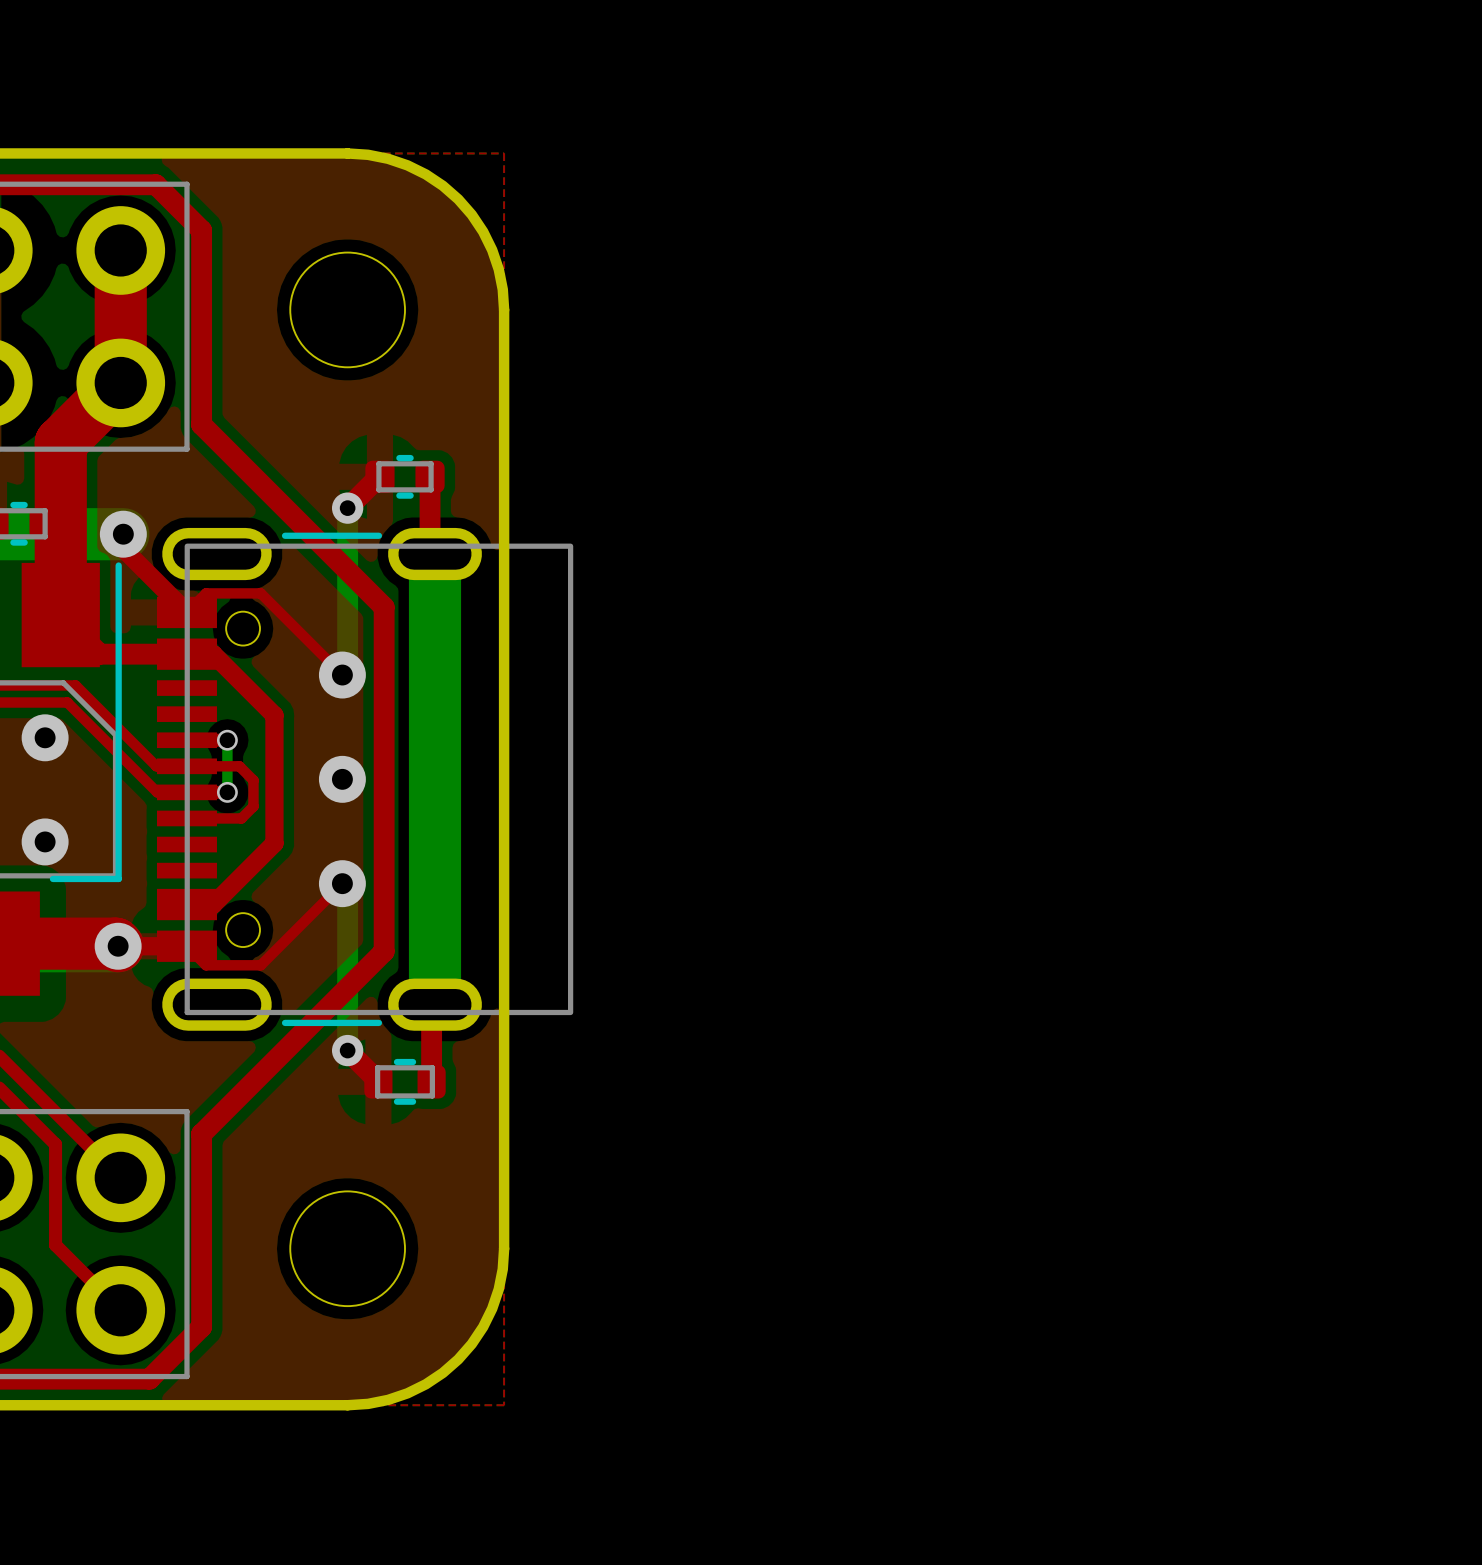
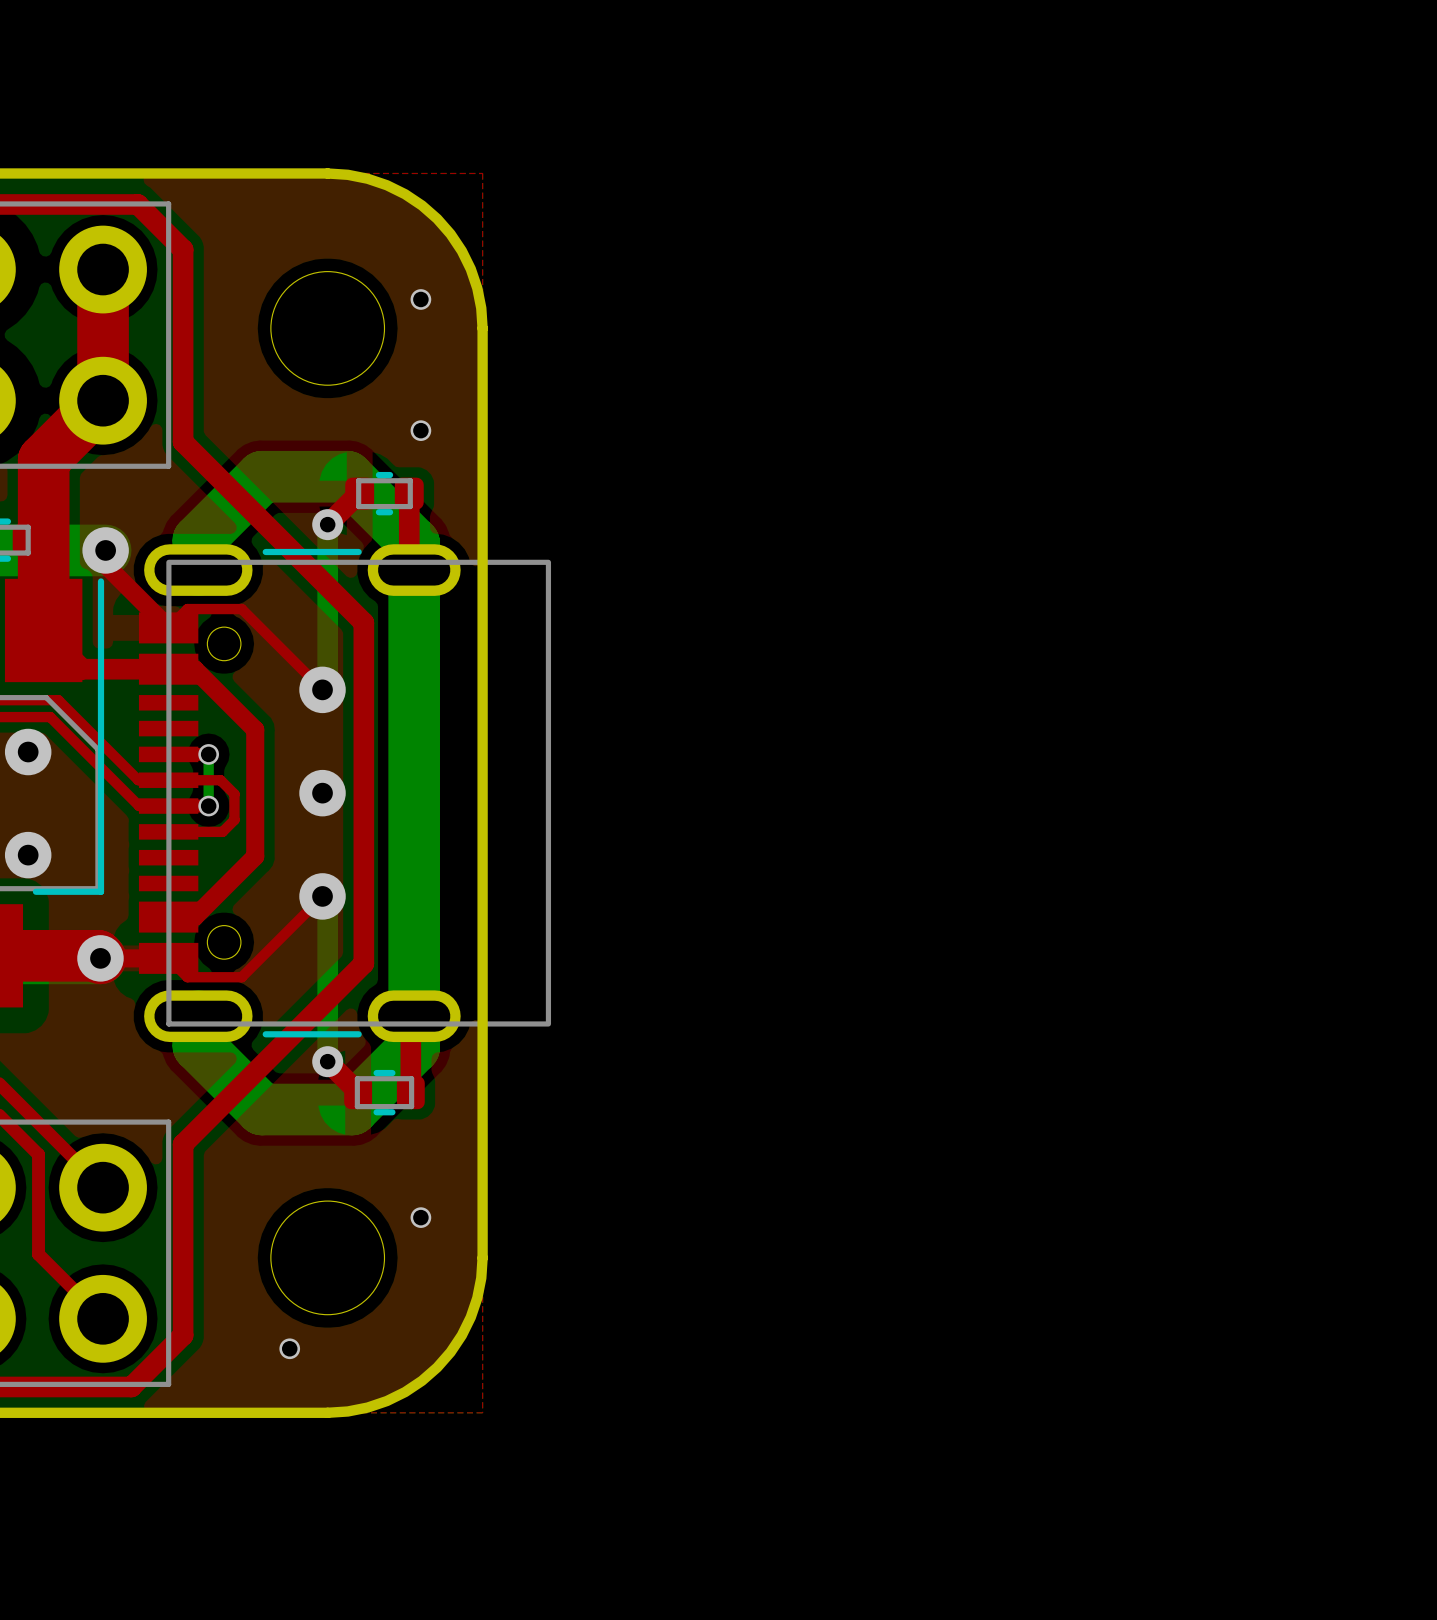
via: none -> (420, 299)
via: none -> (420, 430)
bottom track: none -> (198, 570) (198, 540) (261, 476) (347, 476) (414, 543) (414, 570)
bottom track: none -> (198, 1016) (198, 1045) (261, 1109) (352, 1109) (414, 1047) (414, 1016)
via: none -> (420, 1217)
via: none -> (289, 1348)

